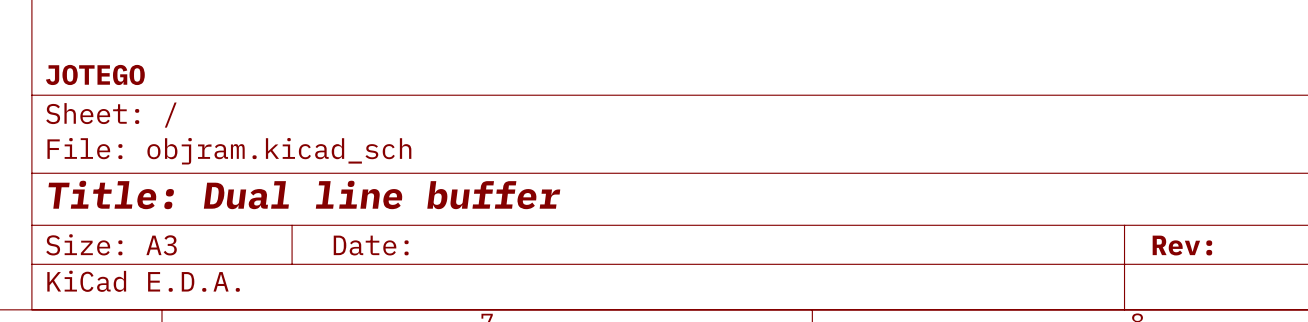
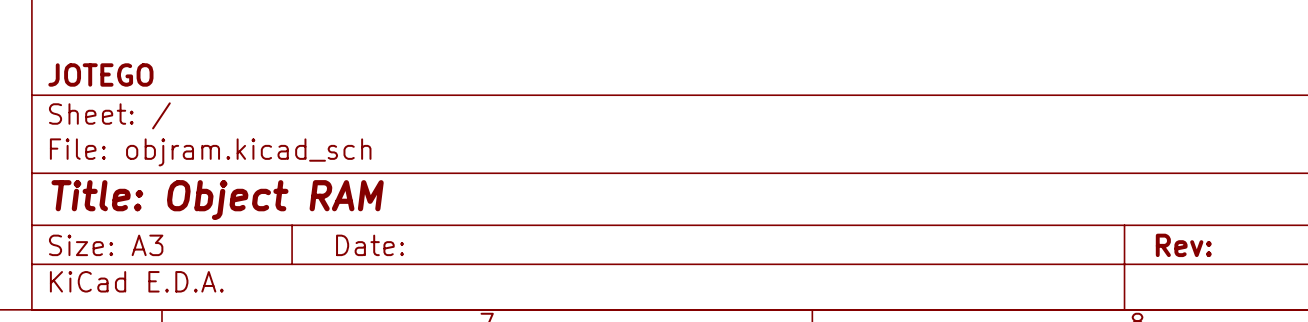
title block: Title: Dual line buffer (304, 194) -> Title: Object RAM (217, 200)

